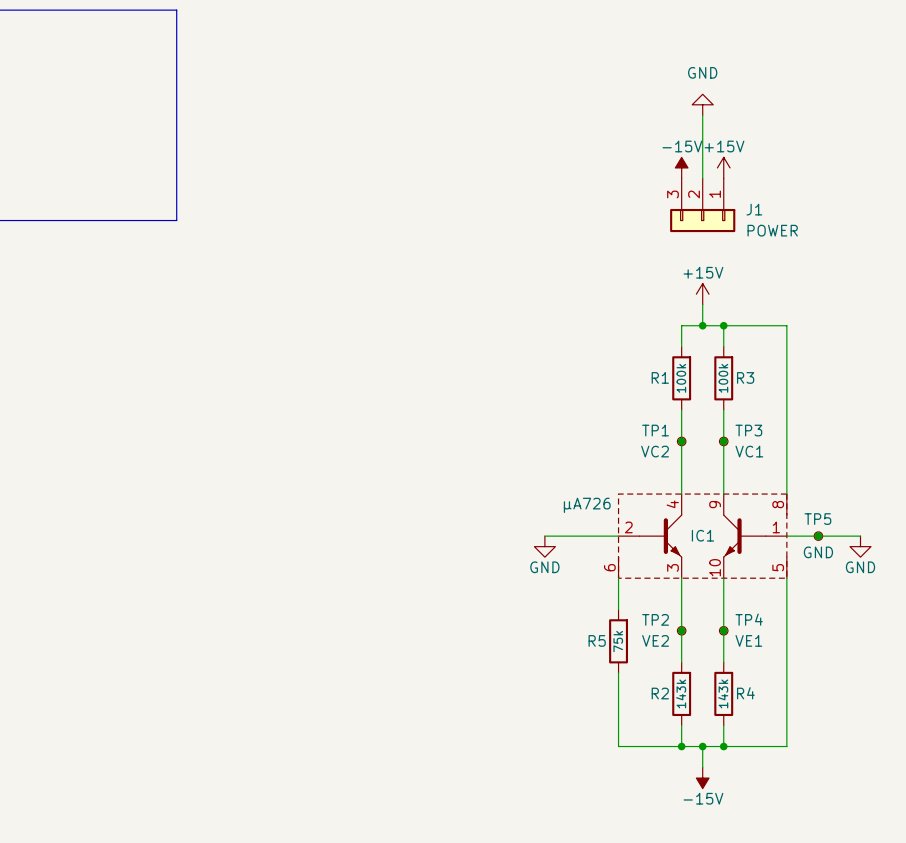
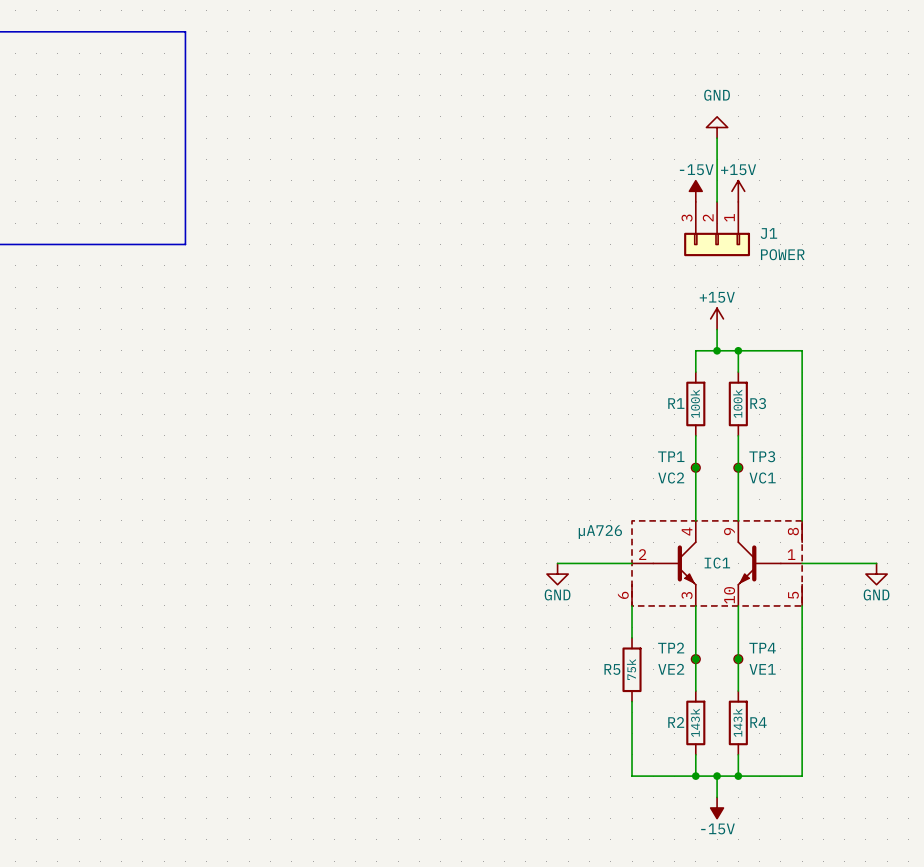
junction: (818, 536) -> none
TP5: GND (818, 536) -> none

